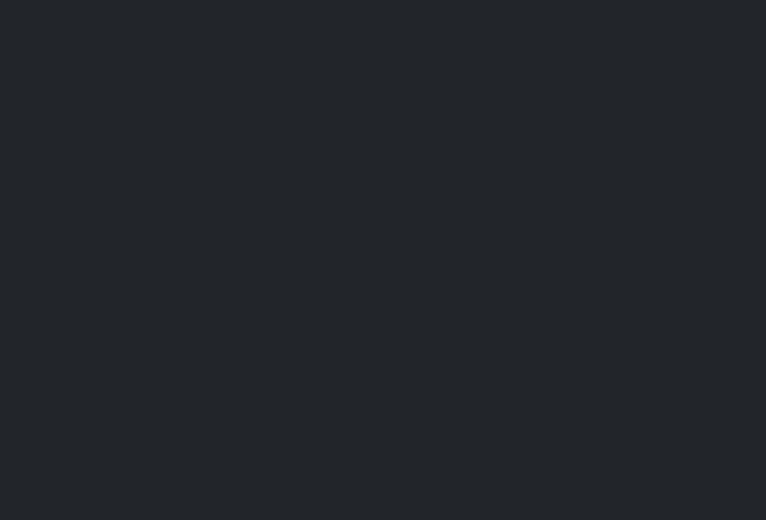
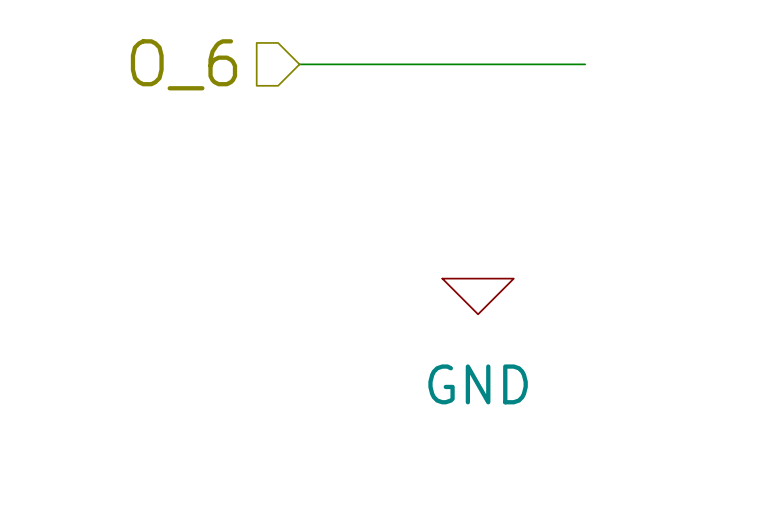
wire: none -> (299, 64) (585, 64)
hierarchical label: none -> O_6 (183, 64)
power symbol: none -> GND (478, 296)

